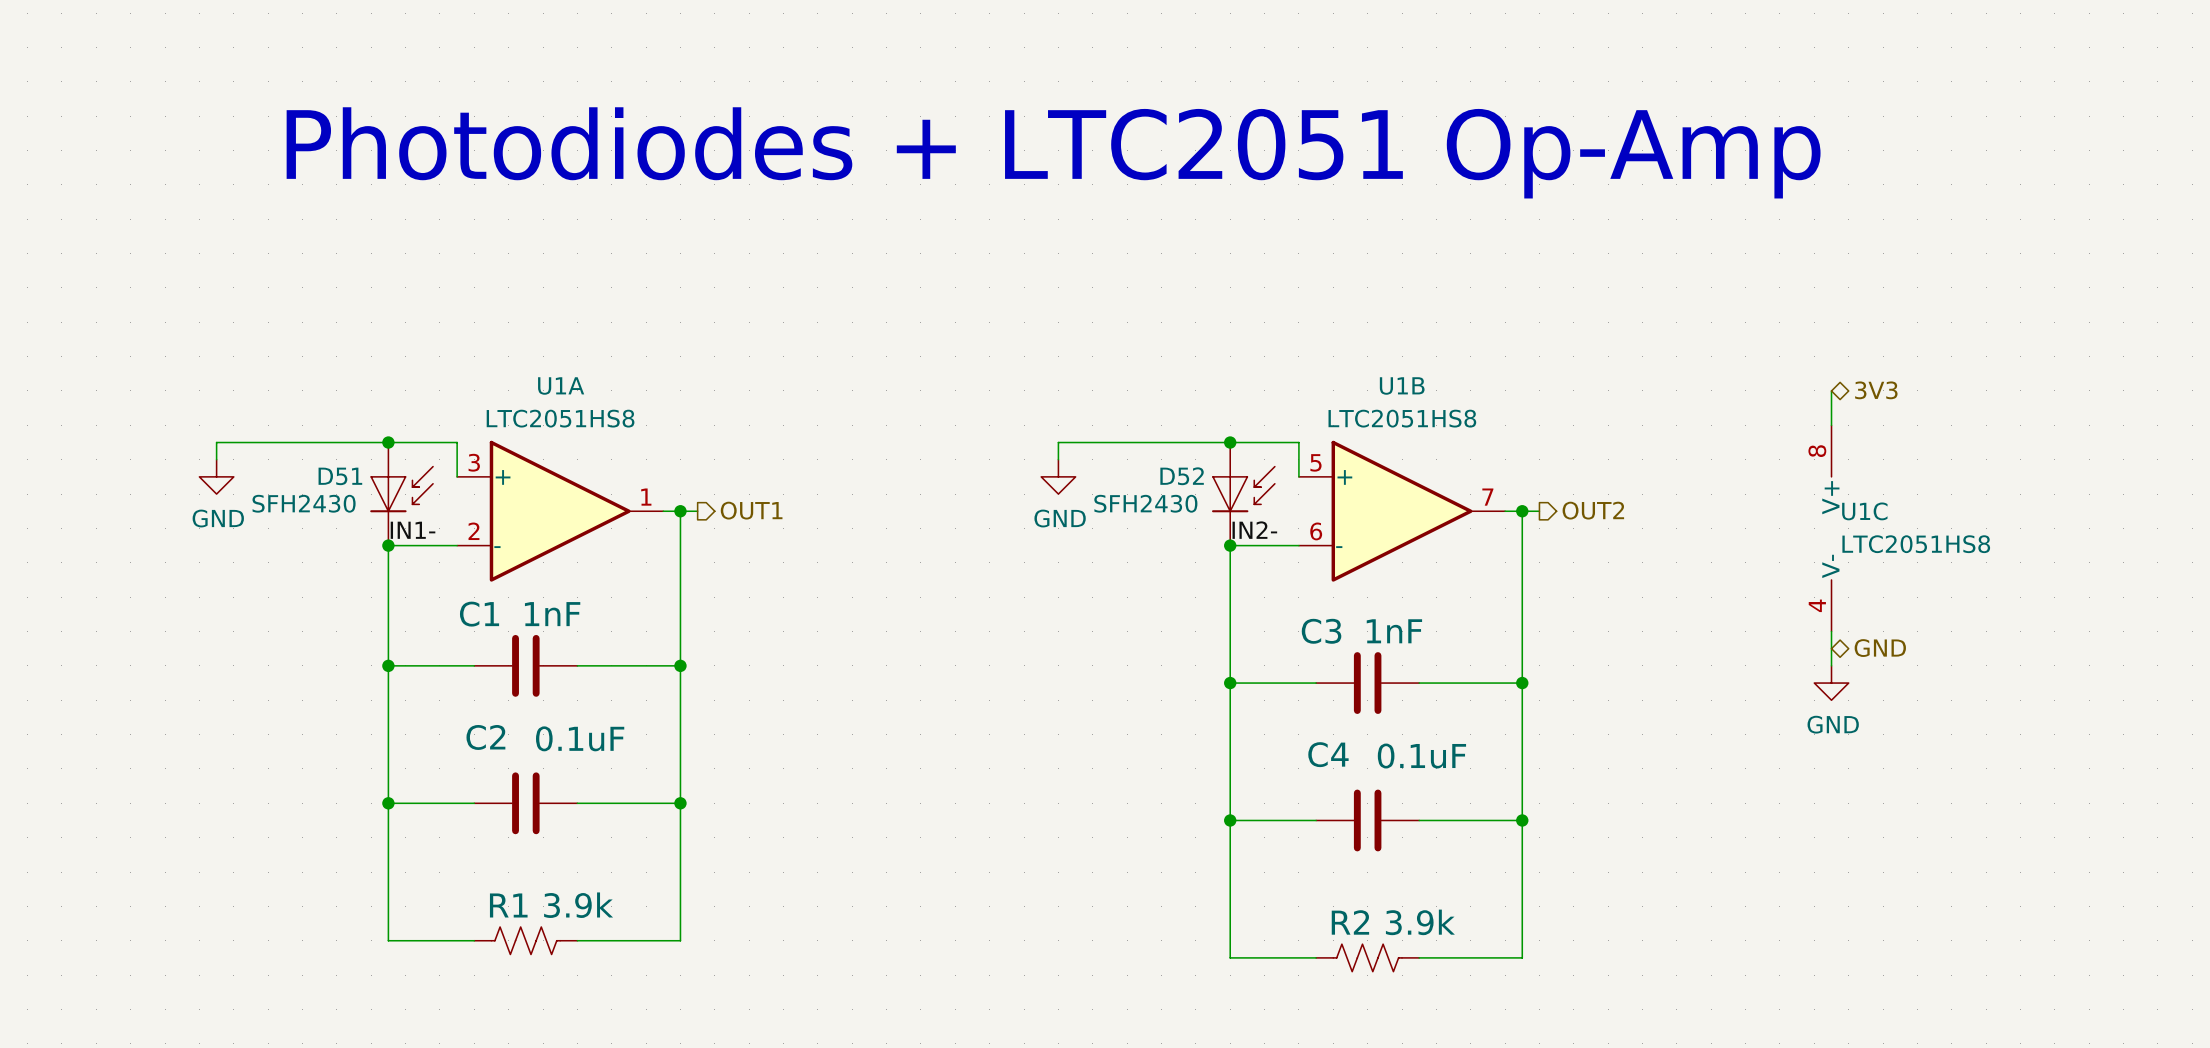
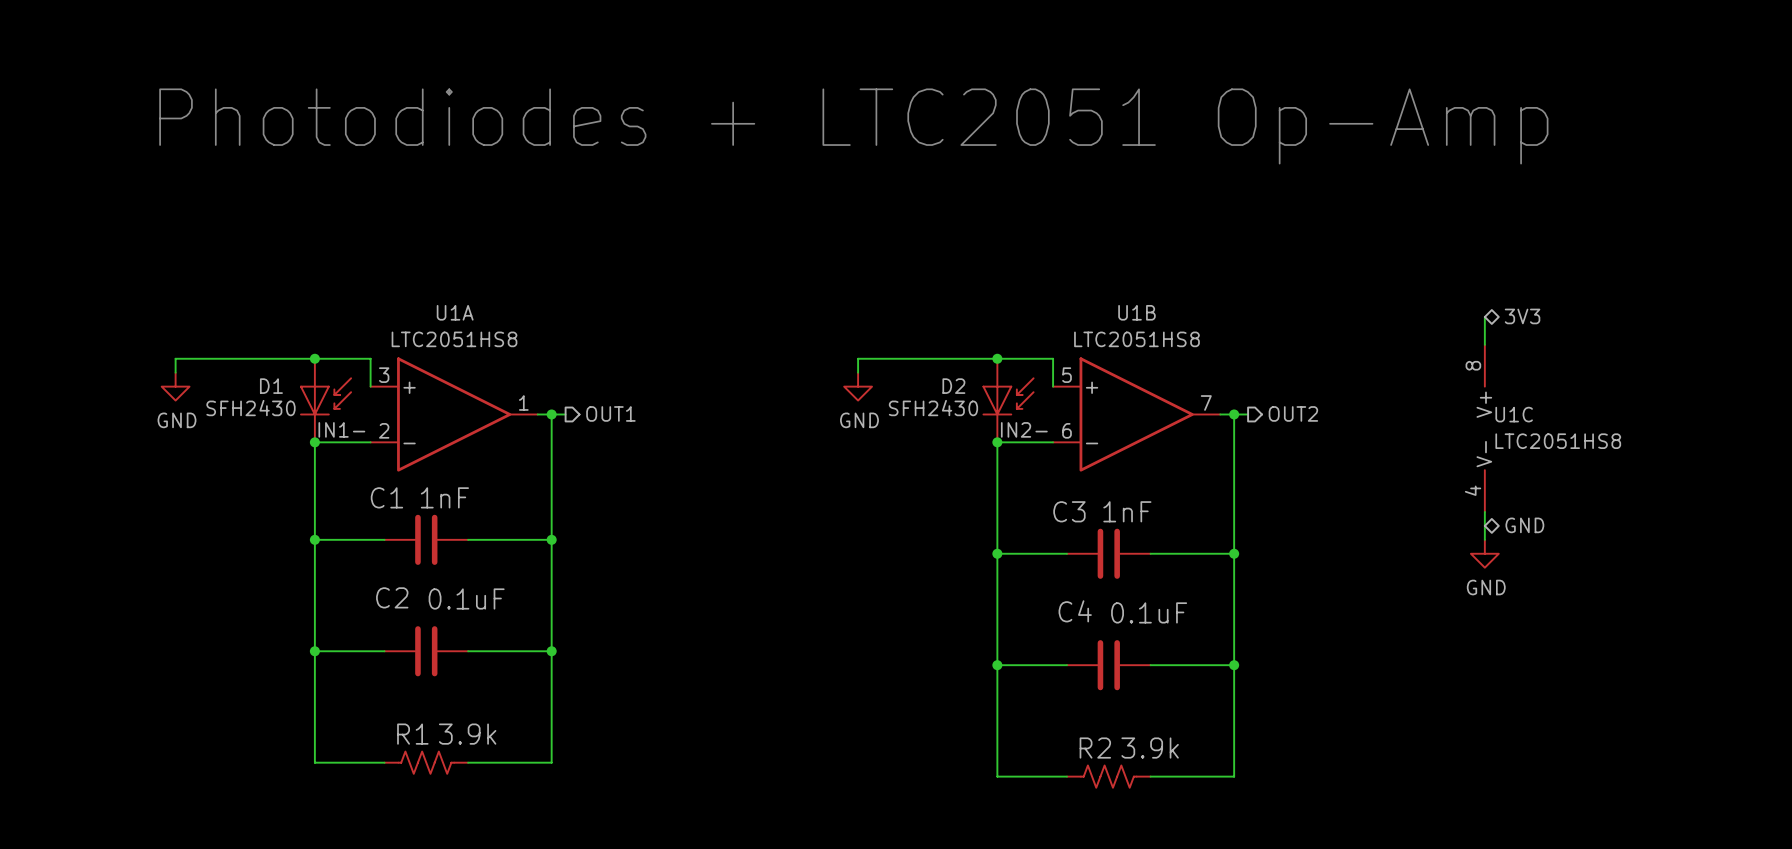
D51 name: D51 (340, 476) -> D1 (271, 386)
D52 name: D52 (1182, 476) -> D2 (953, 386)

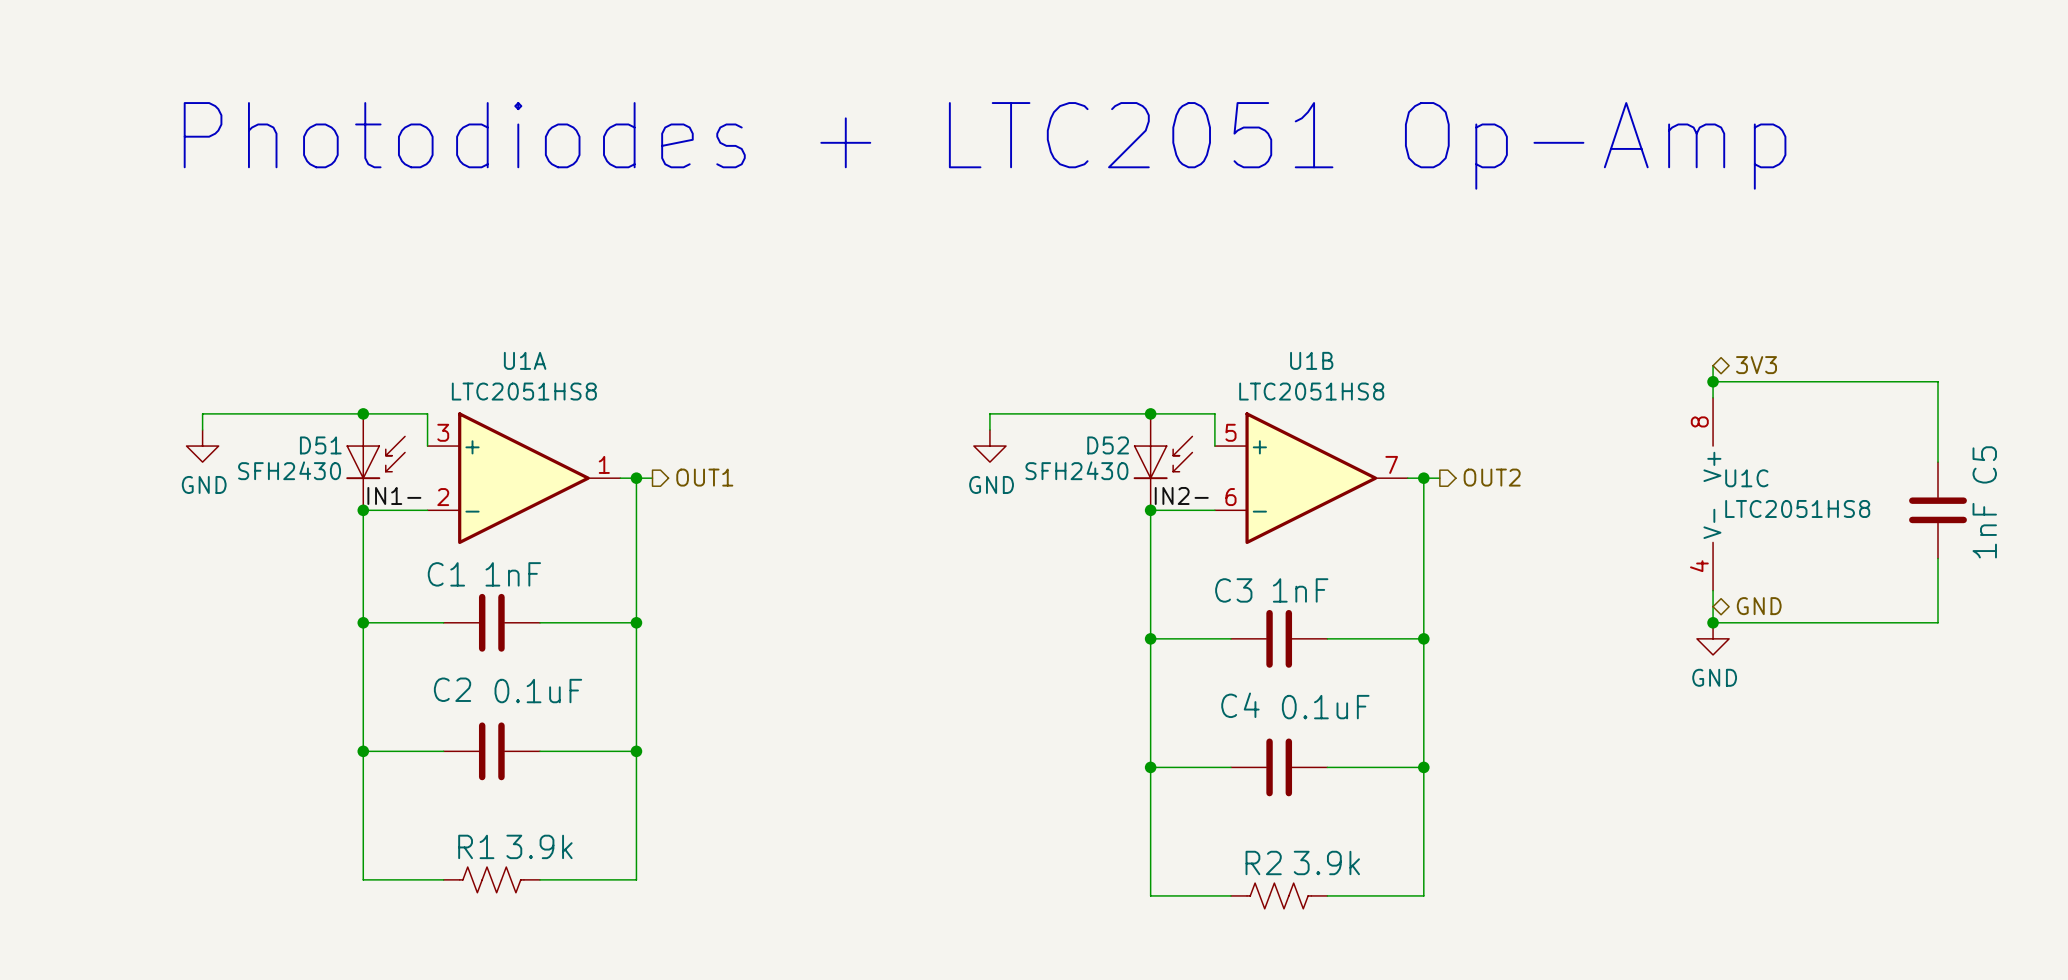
wire: none -> (1713, 381) (1938, 381) (1938, 462)
junction: none -> (1713, 381)
D1 name: D1 (271, 386) -> D51 (320, 445)
D2 name: D2 (953, 386) -> D52 (1108, 445)
C5: none -> 1nF (1938, 510)
wire: none -> (1938, 558) (1938, 622) (1713, 622)
junction: none -> (1713, 622)

